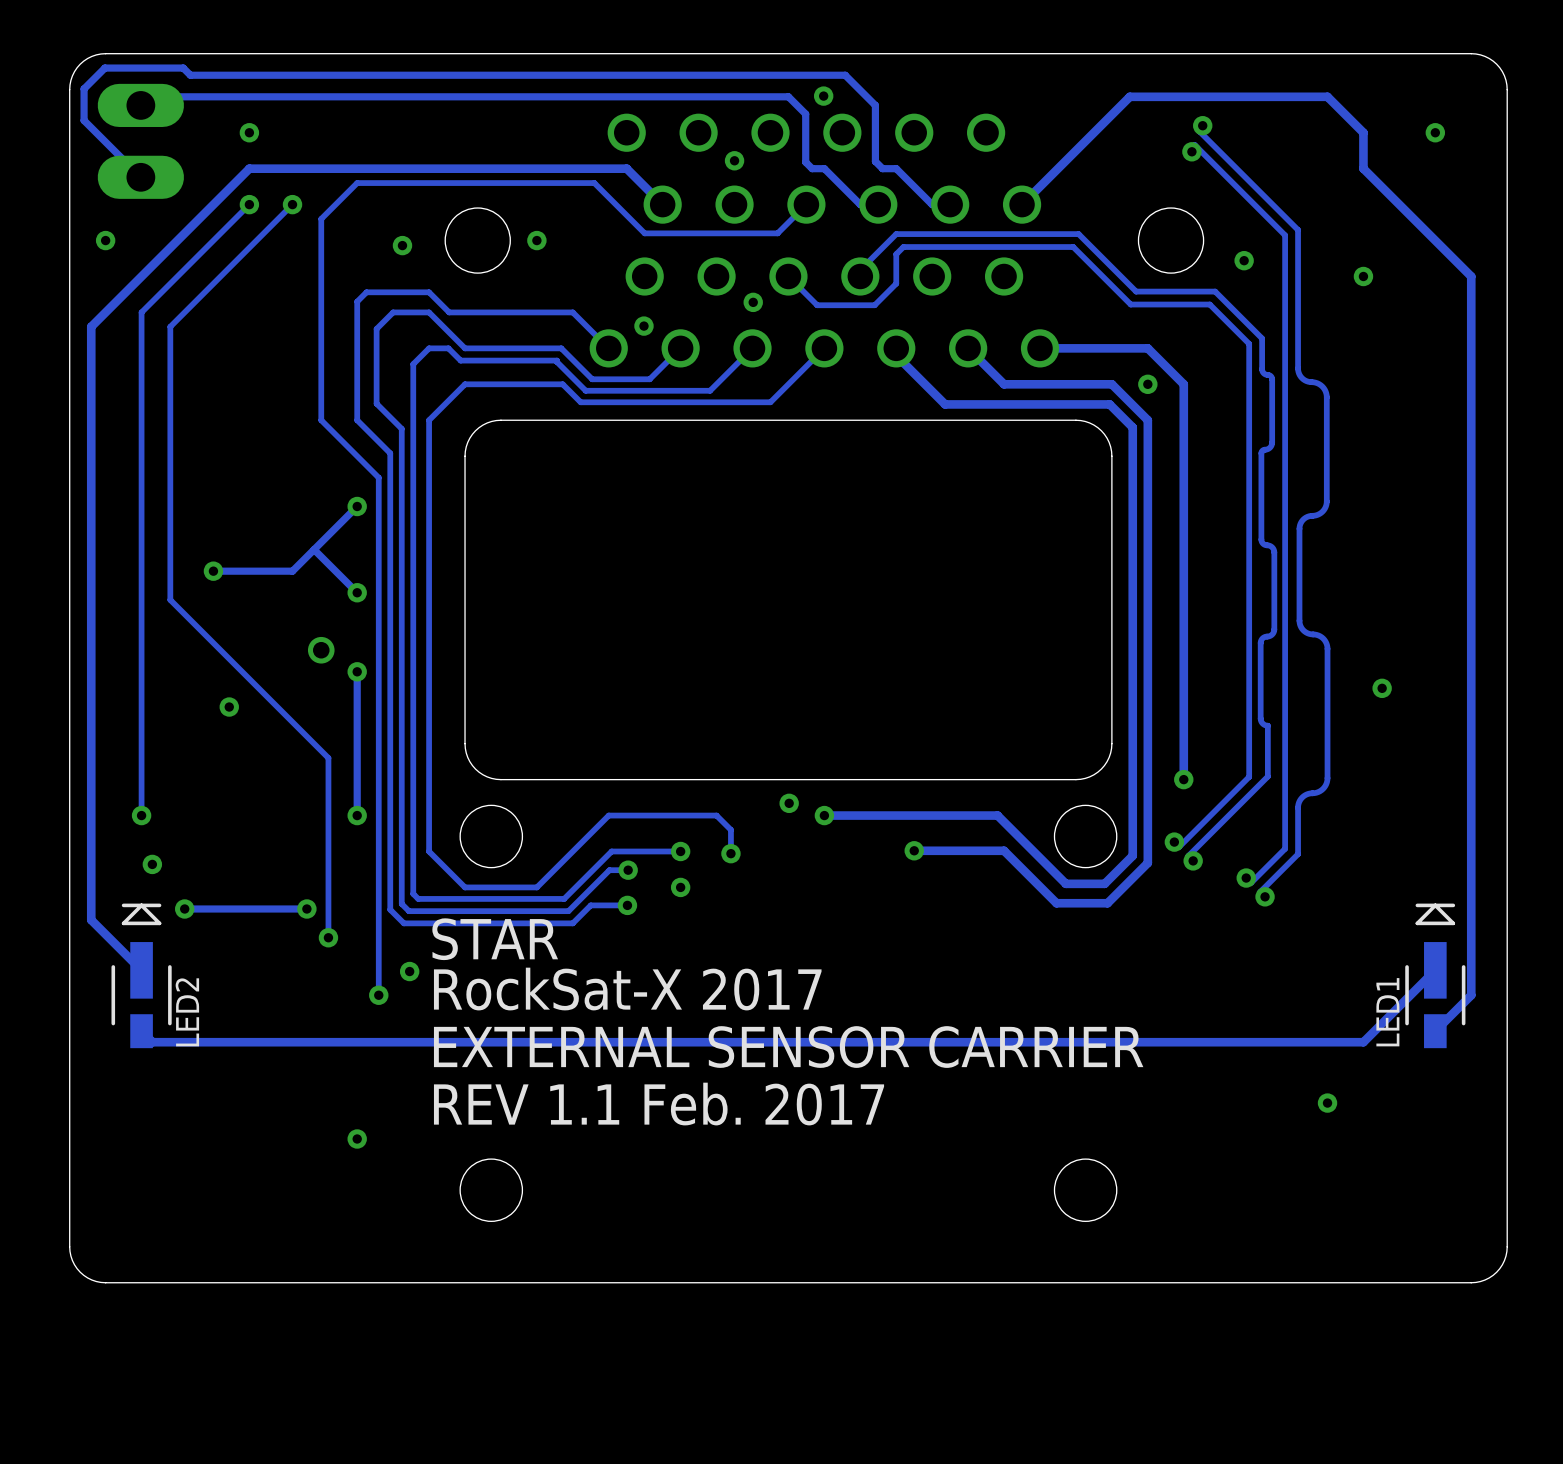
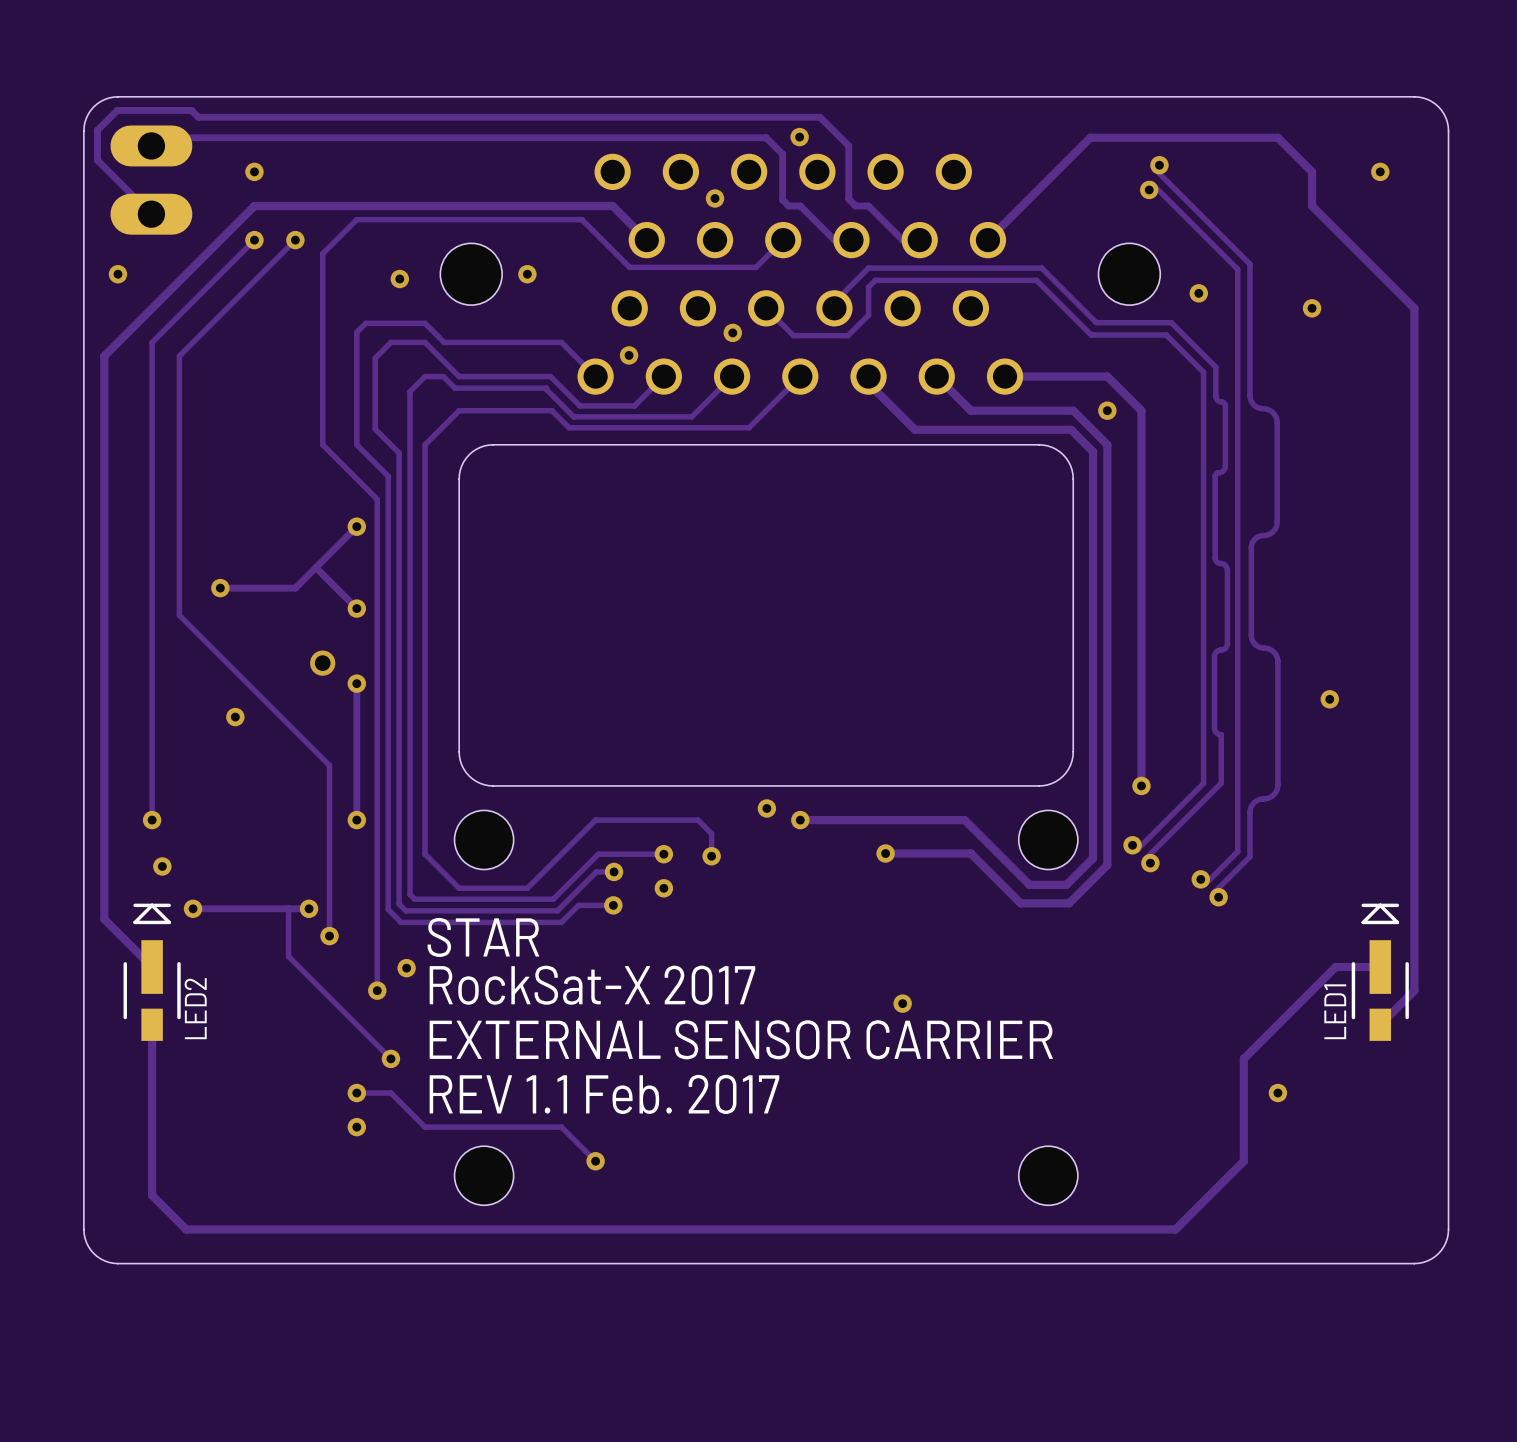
track: none -> (288, 908) (288, 956) (390, 1058)
track: (1435, 970) (1363, 1042) (152, 1042) (141, 1031) -> (1380, 967) (1335, 967) (1243, 1058) (1243, 1161) (1175, 1229) (186, 1229) (152, 1195) (152, 1024)
via: none -> (902, 1003)
via: none -> (390, 1058)
track: none -> (356, 1093) (390, 1093) (425, 1127) (561, 1127) (595, 1161)
via: none -> (356, 1093)
via: none -> (595, 1161)

